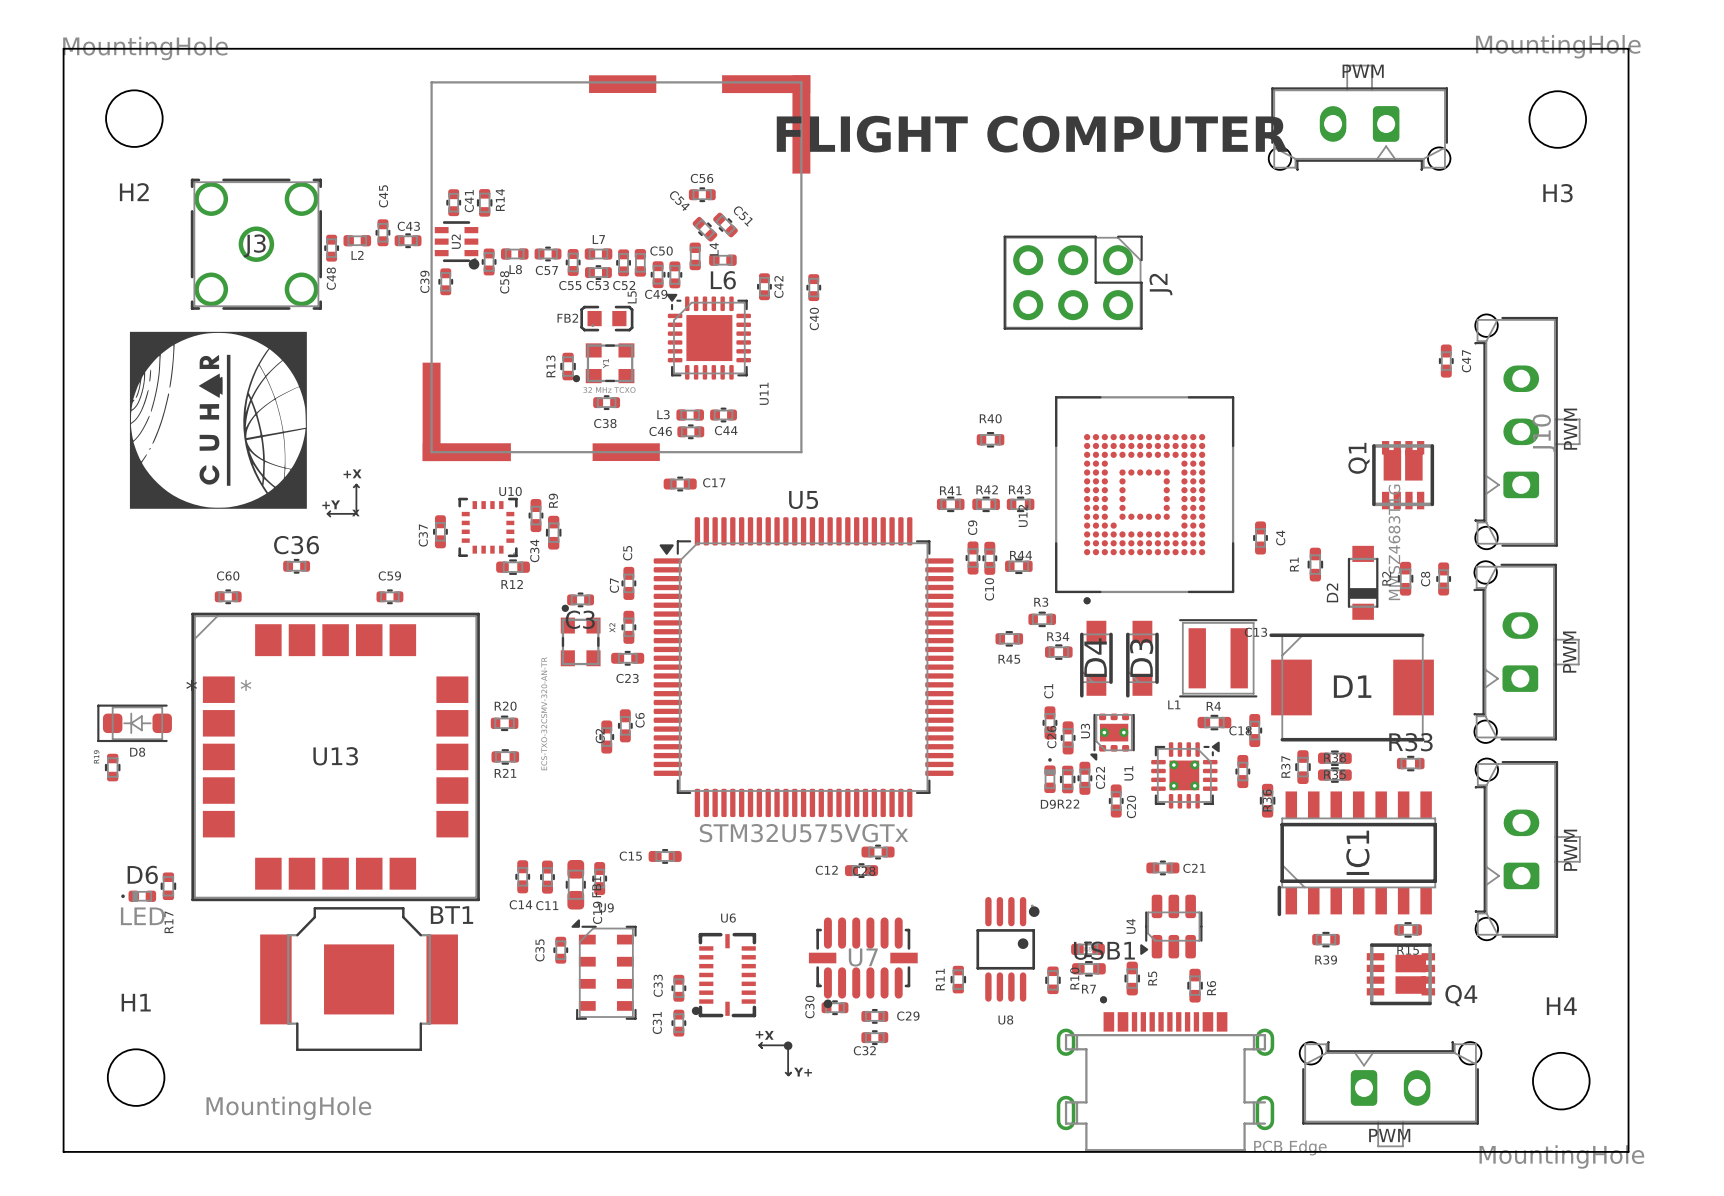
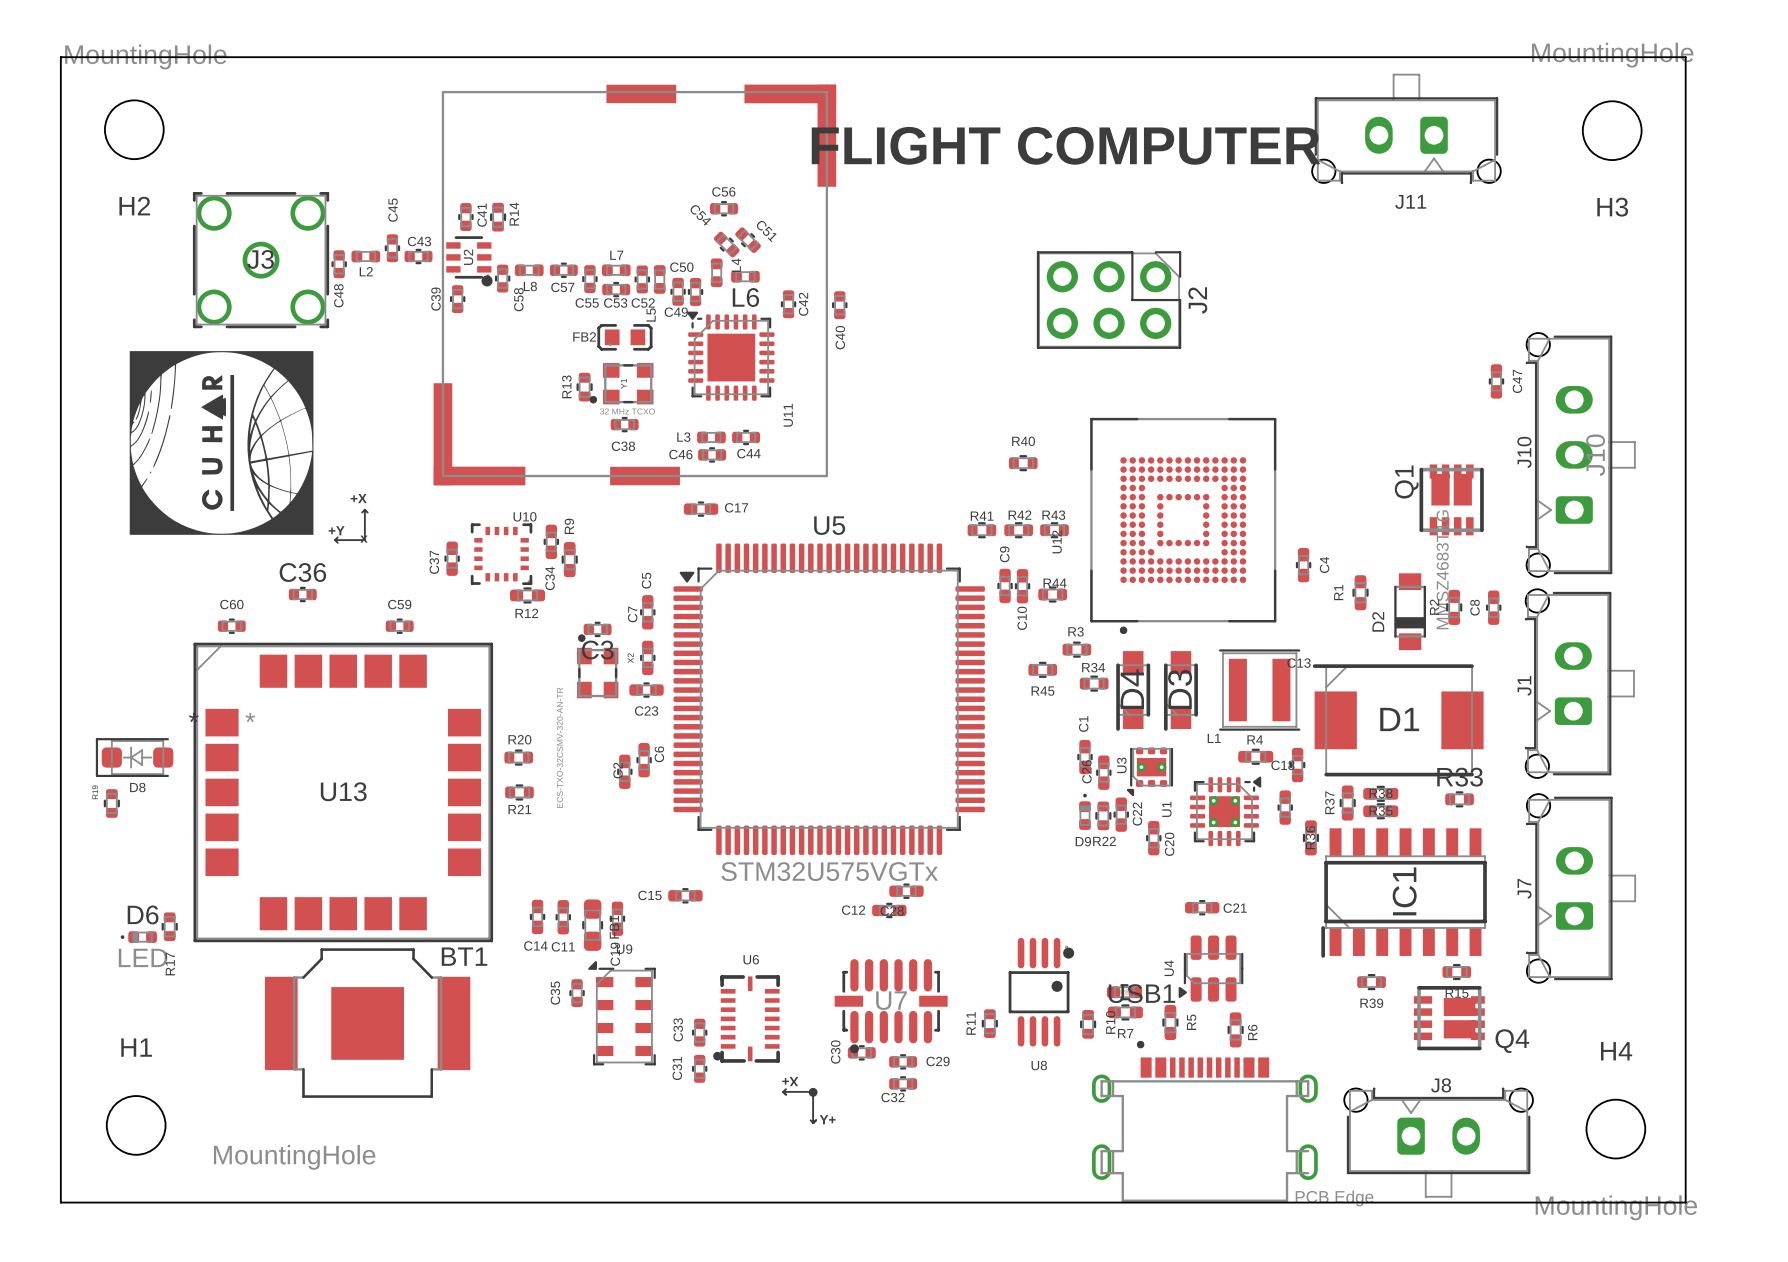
PWM name: PWM (1363, 71) -> J11 (1410, 201)
PWM name: PWM (1570, 429) -> J10 (1524, 452)
PWM name: PWM (1569, 652) -> J1 (1524, 685)
PWM name: PWM (1570, 850) -> J7 (1524, 888)
PWM name: PWM (1389, 1135) -> J8 (1441, 1085)

